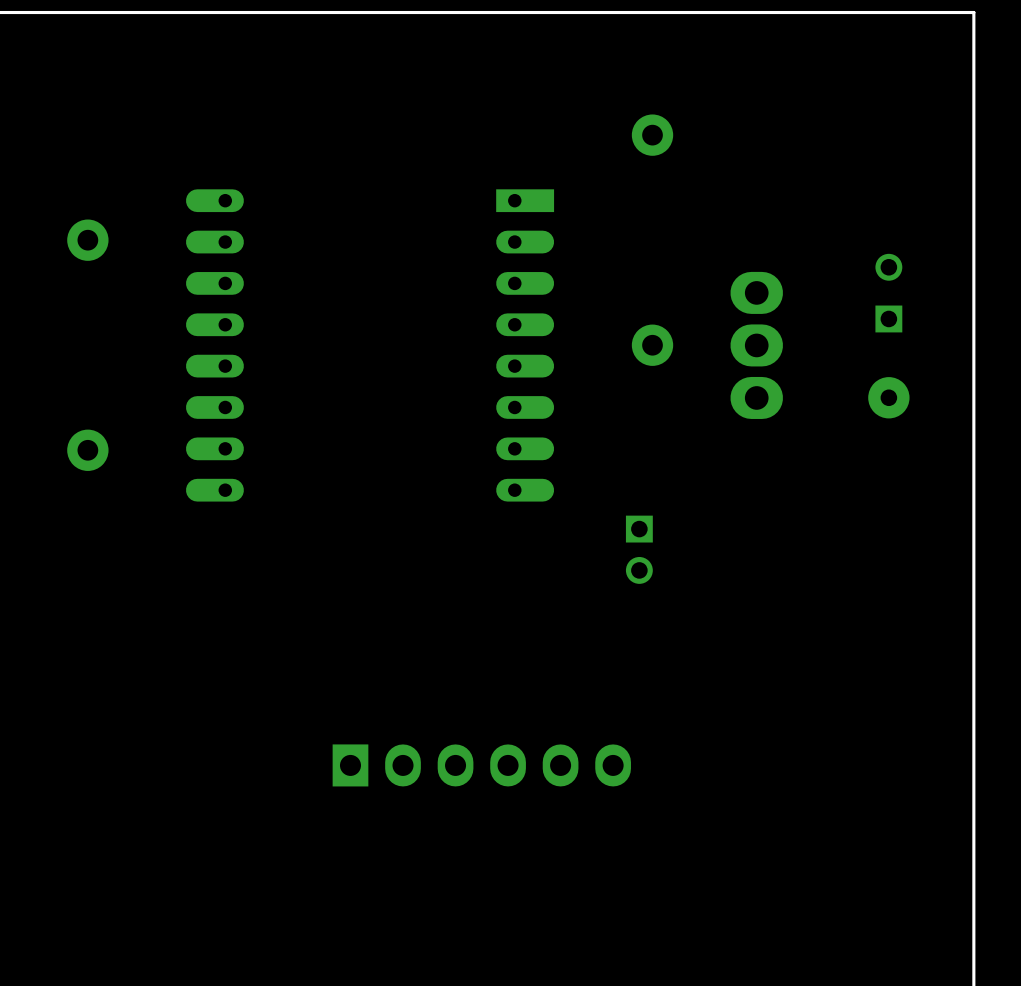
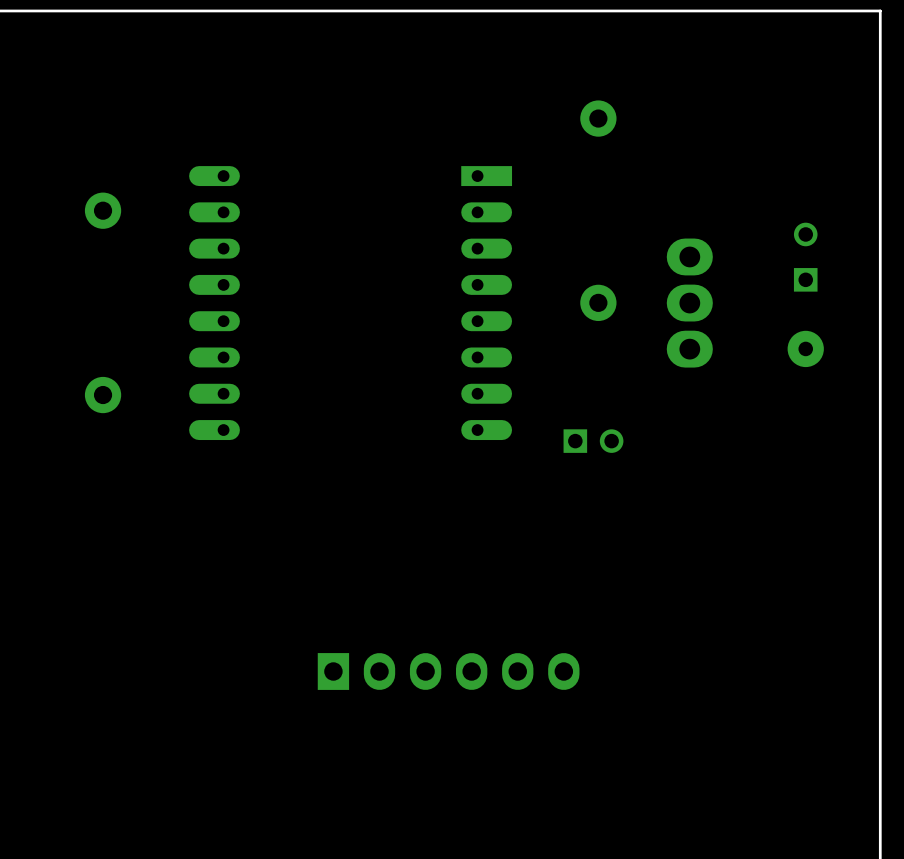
part rotation: 0° (639, 549) -> 90° counterclockwise (593, 441)
part position: (639, 549) -> (593, 441)

